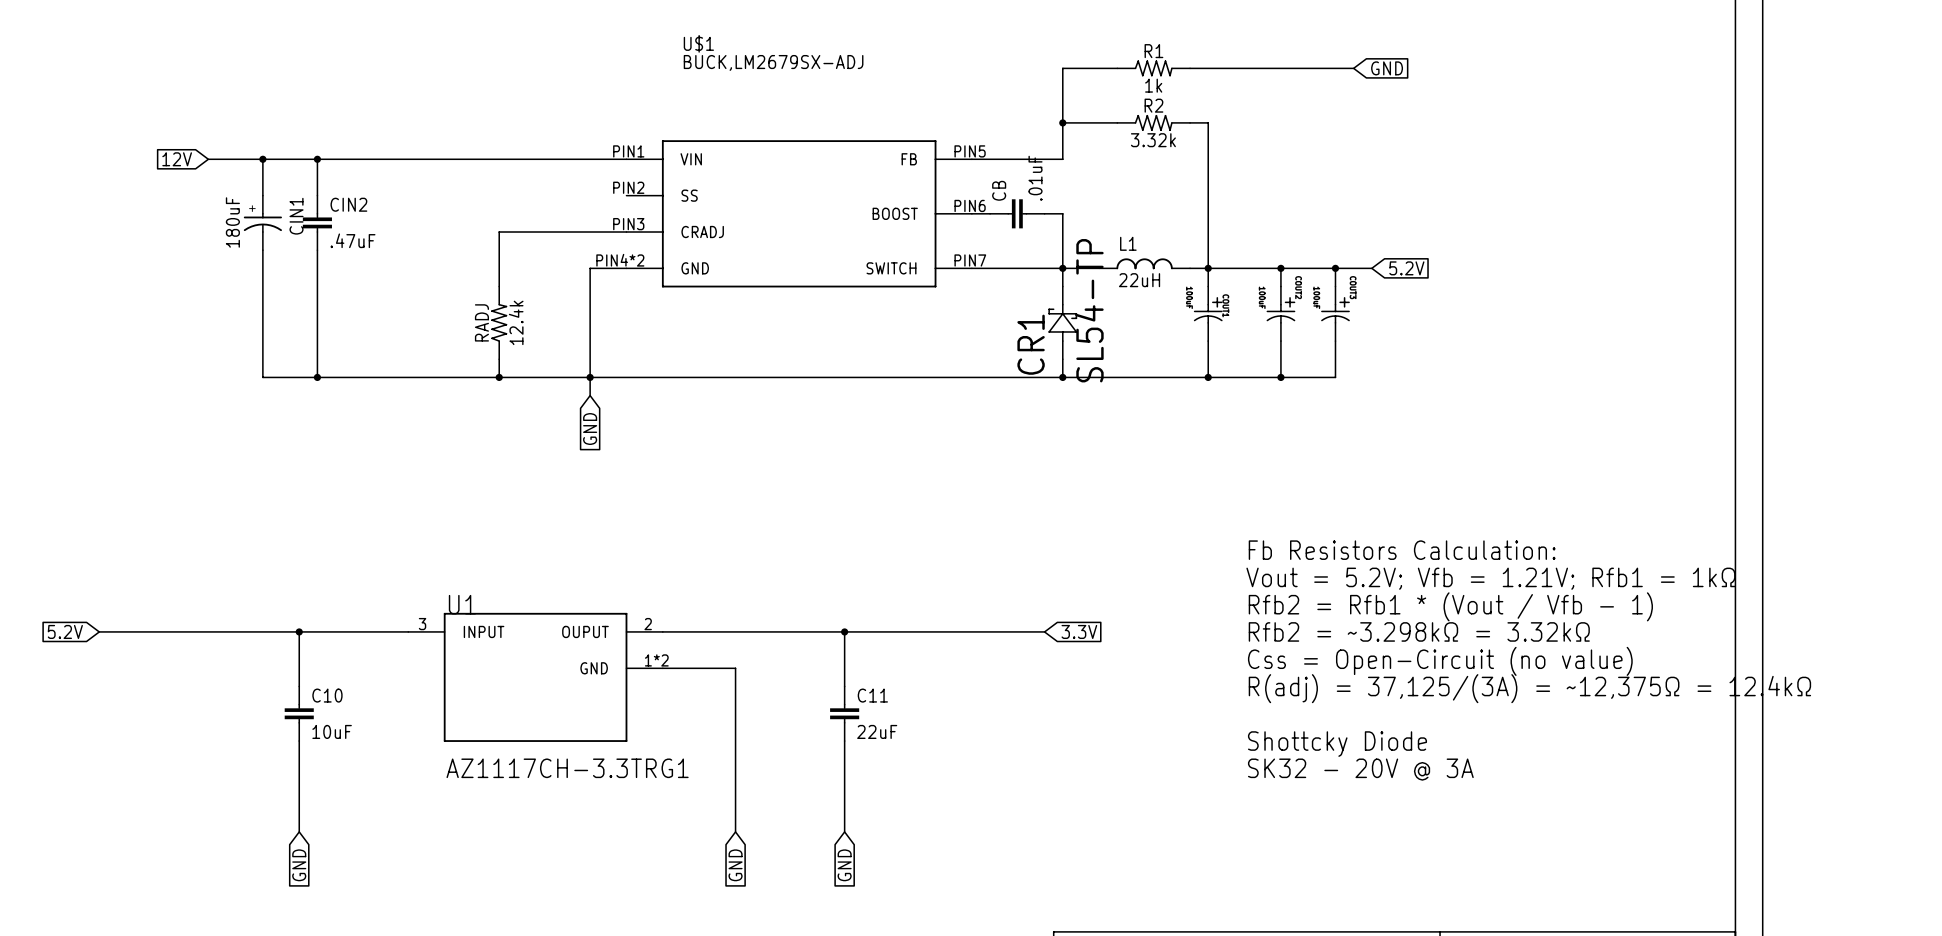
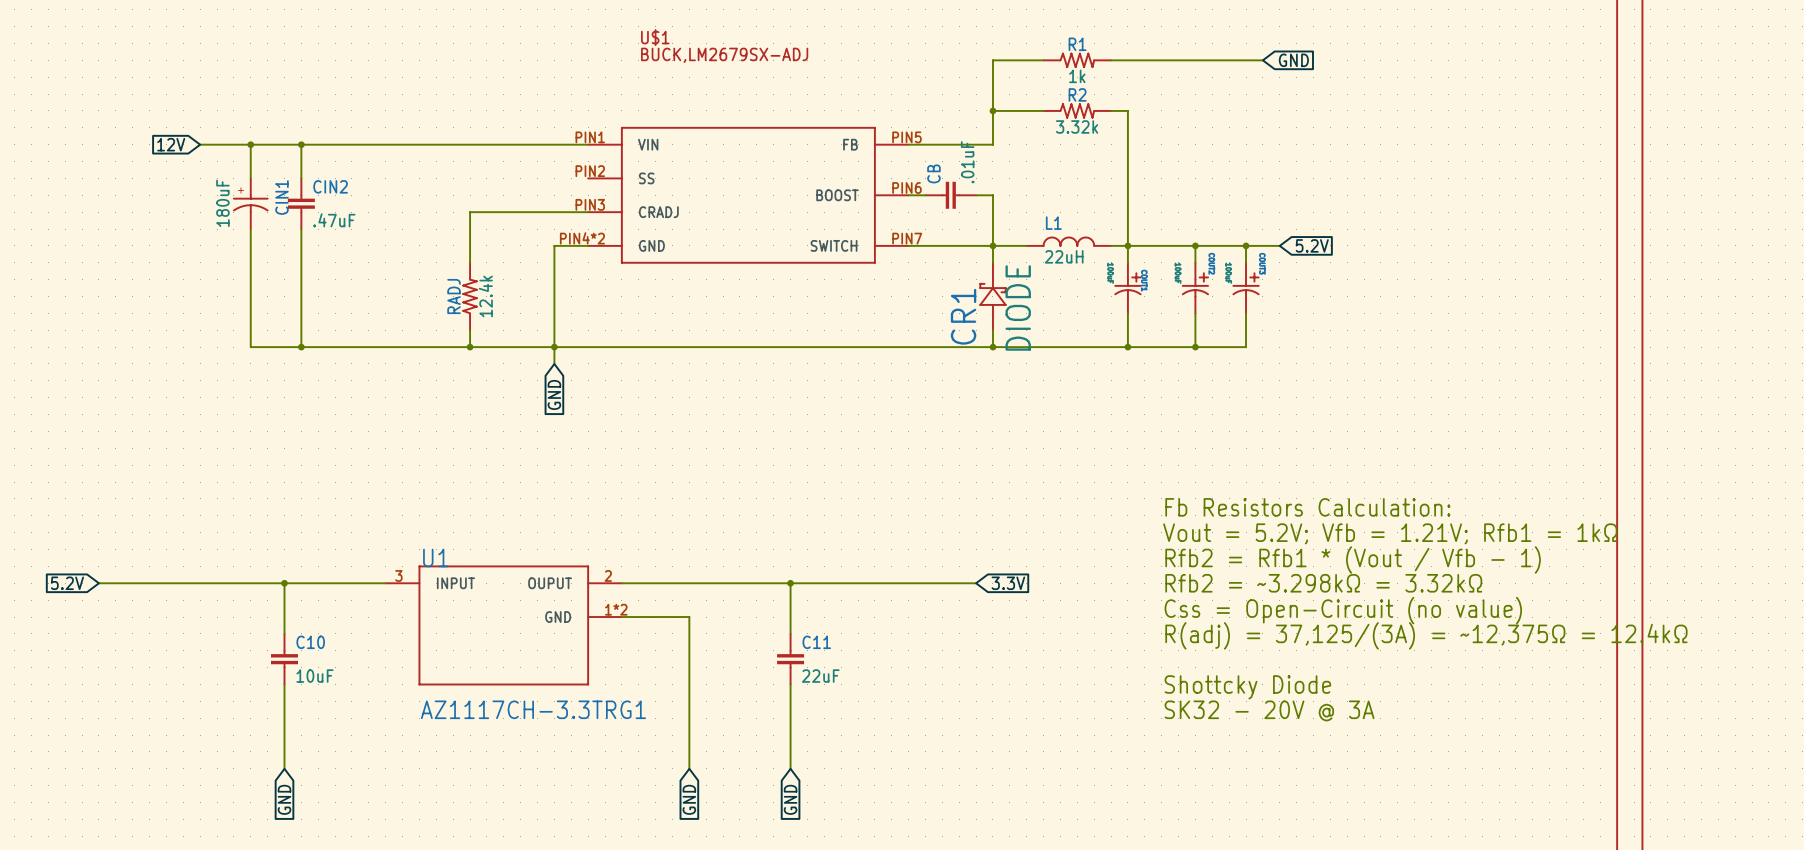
CR1 value: SL54-TP (1089, 310) -> DIODE (1018, 307)

